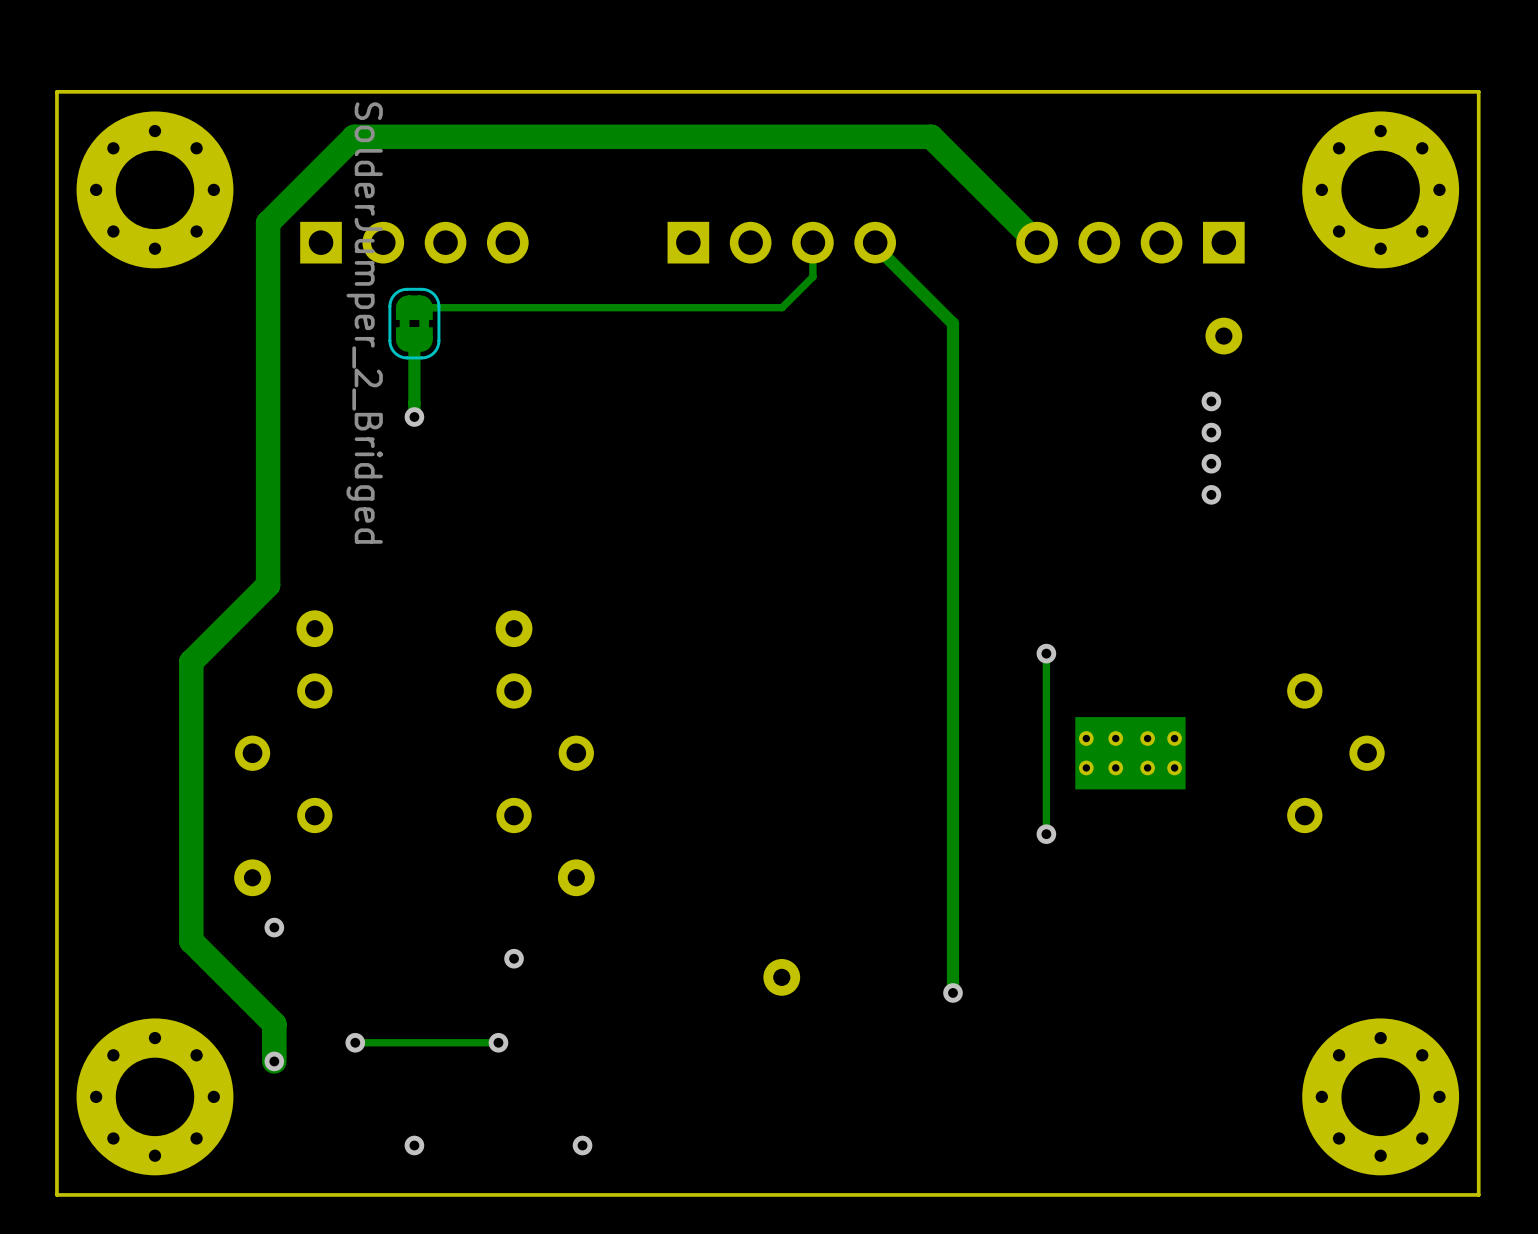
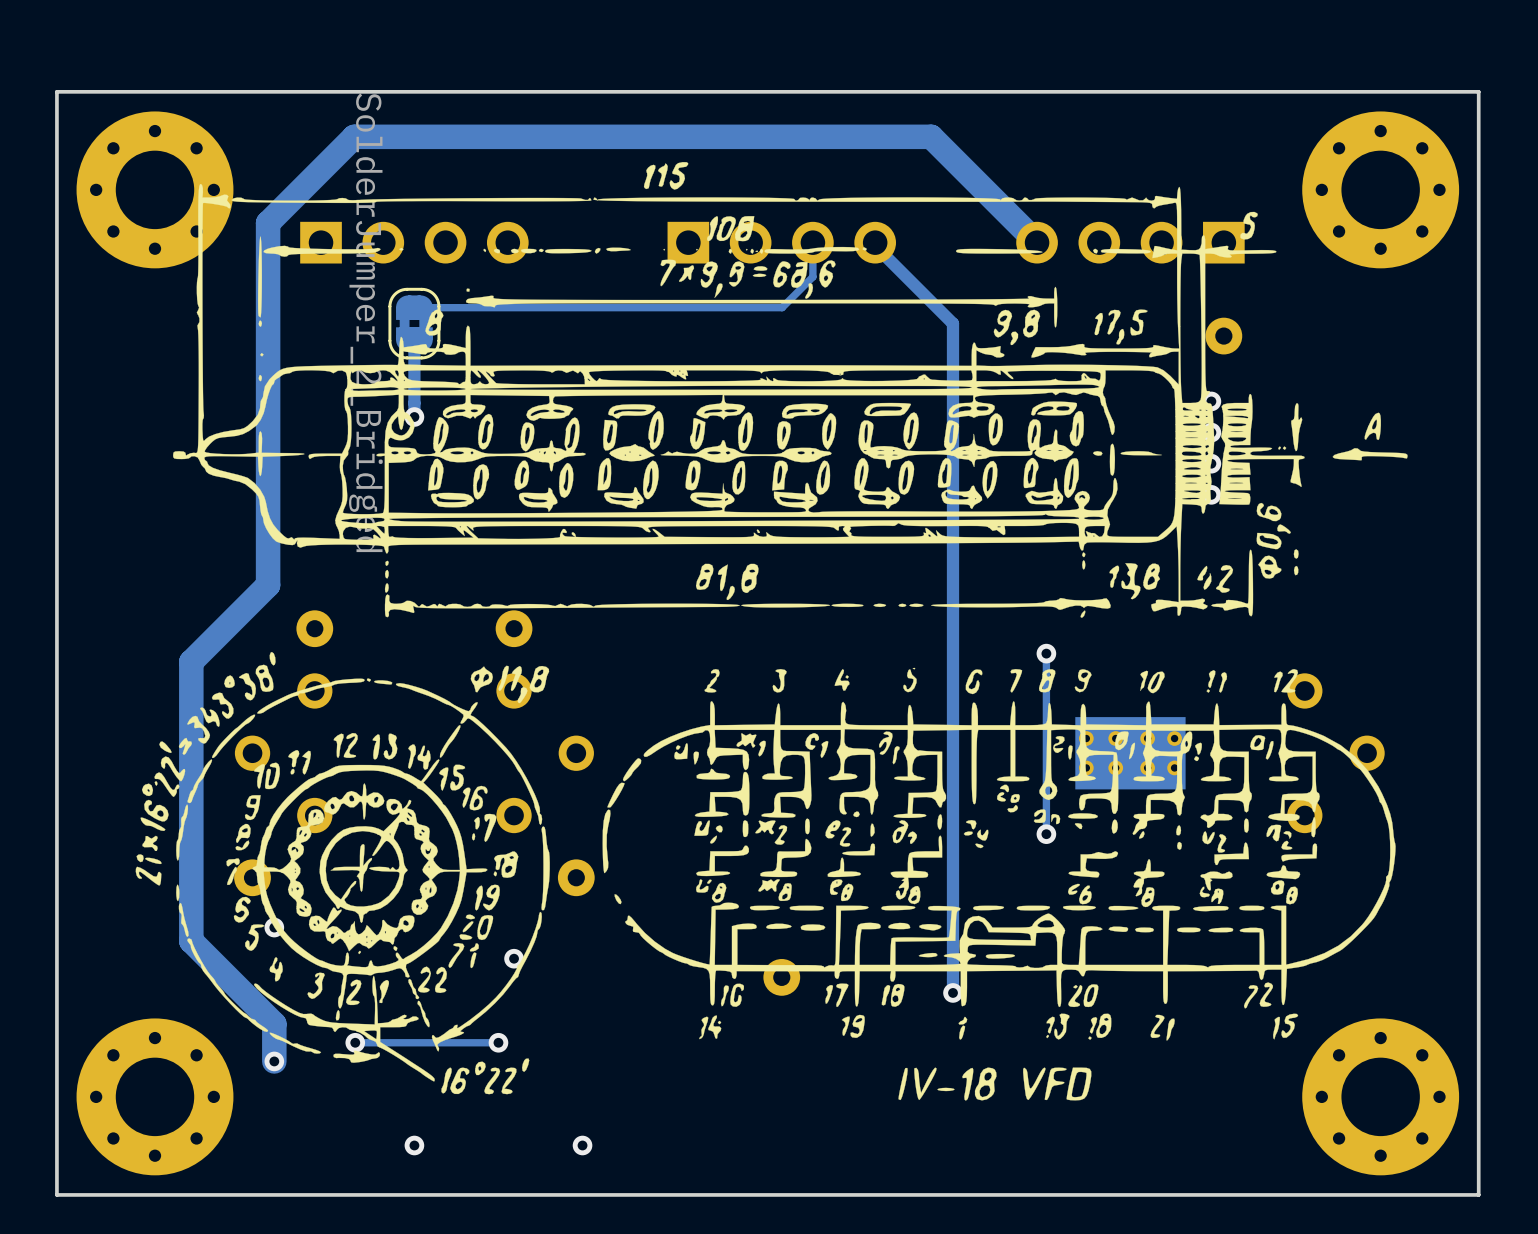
drawing: none -> [135, 162, 1408, 1101]

